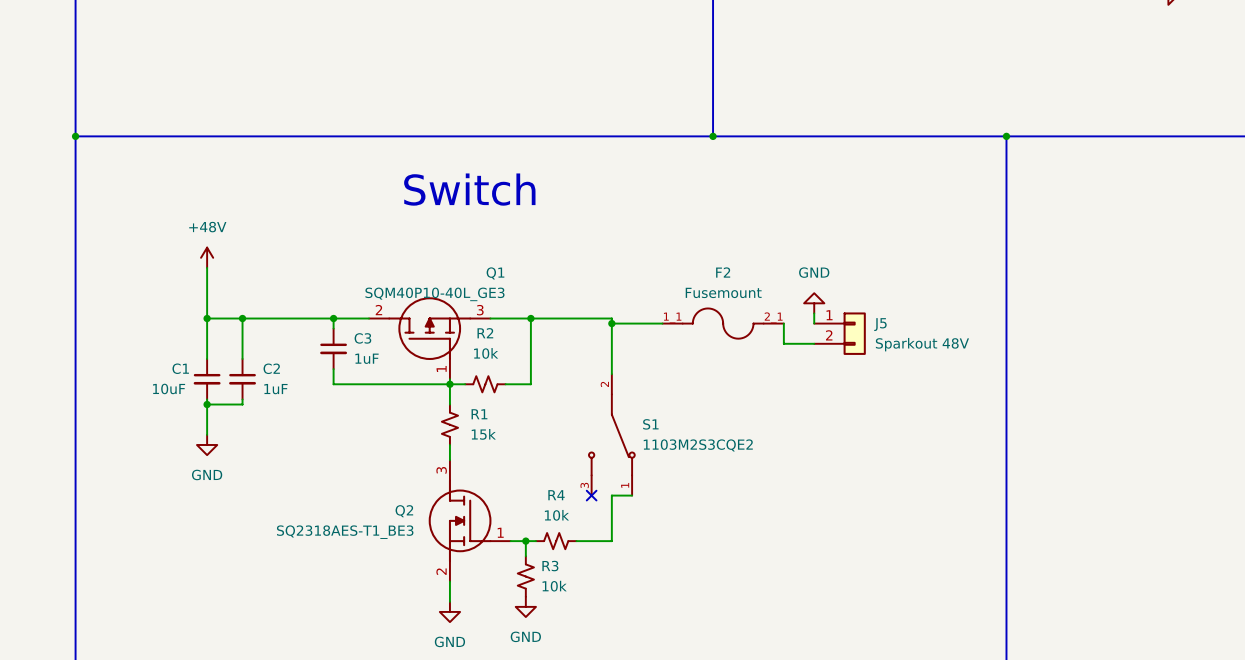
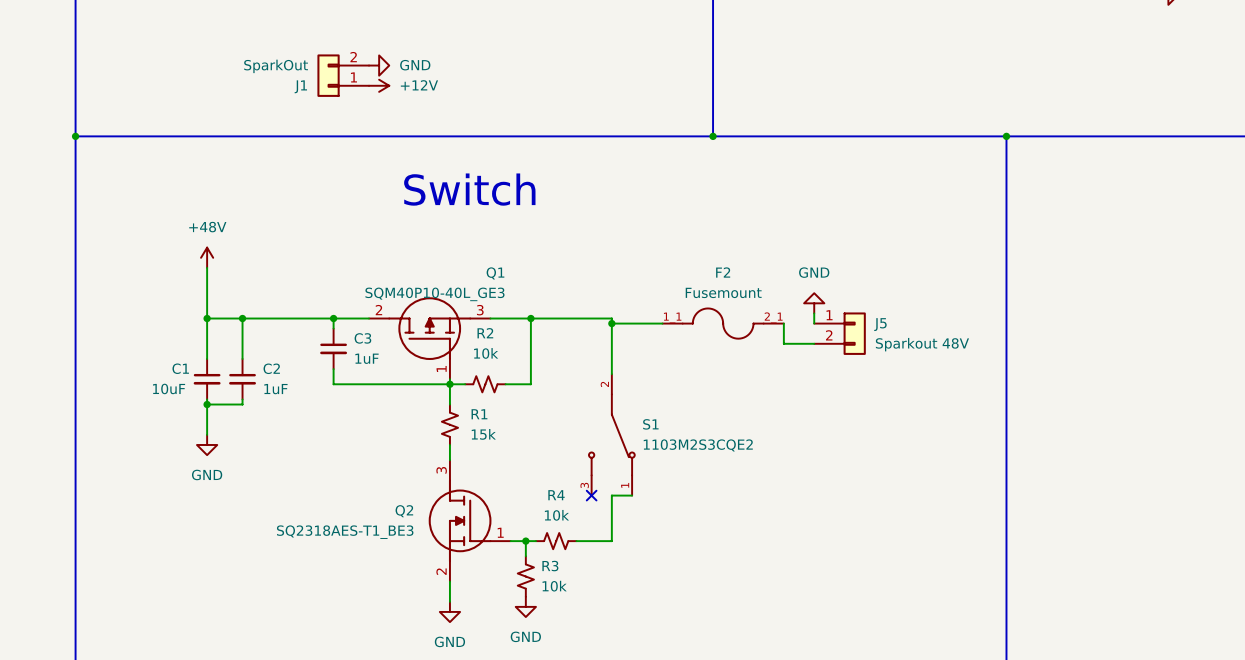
power symbol: none -> GND (379, 65)
J1: none -> SparkOut (343, 75)
power symbol: none -> +12V (379, 85)

